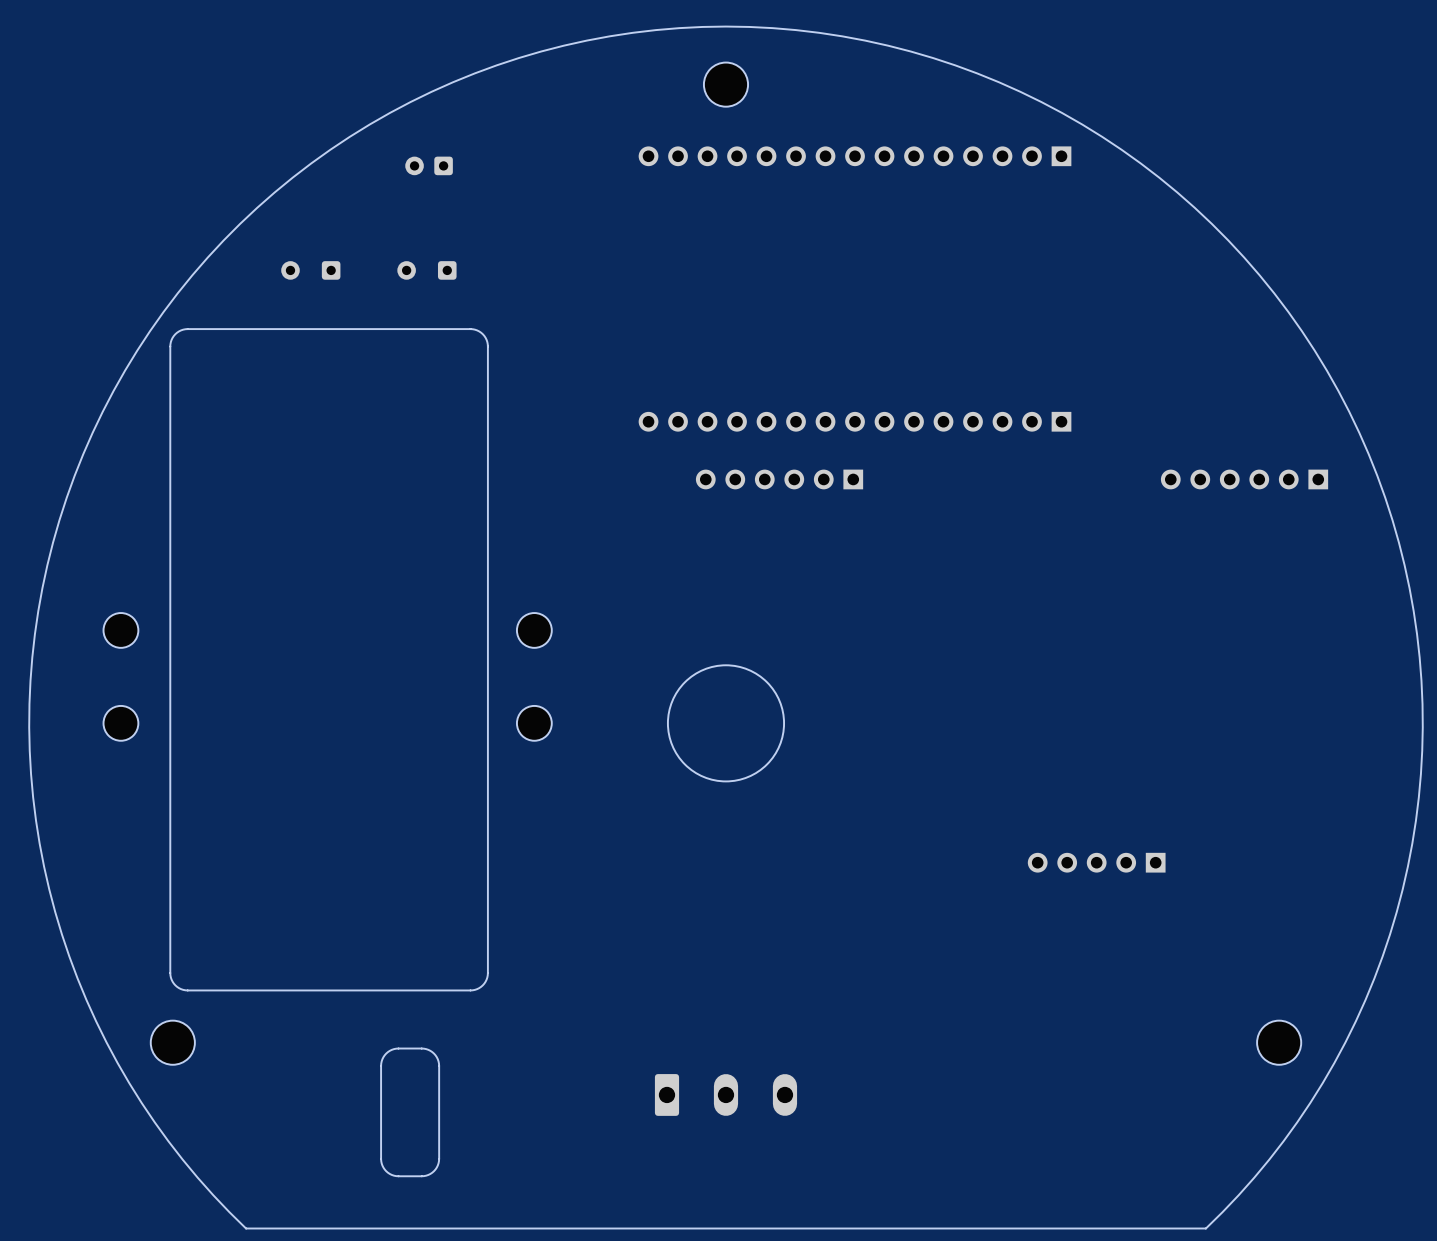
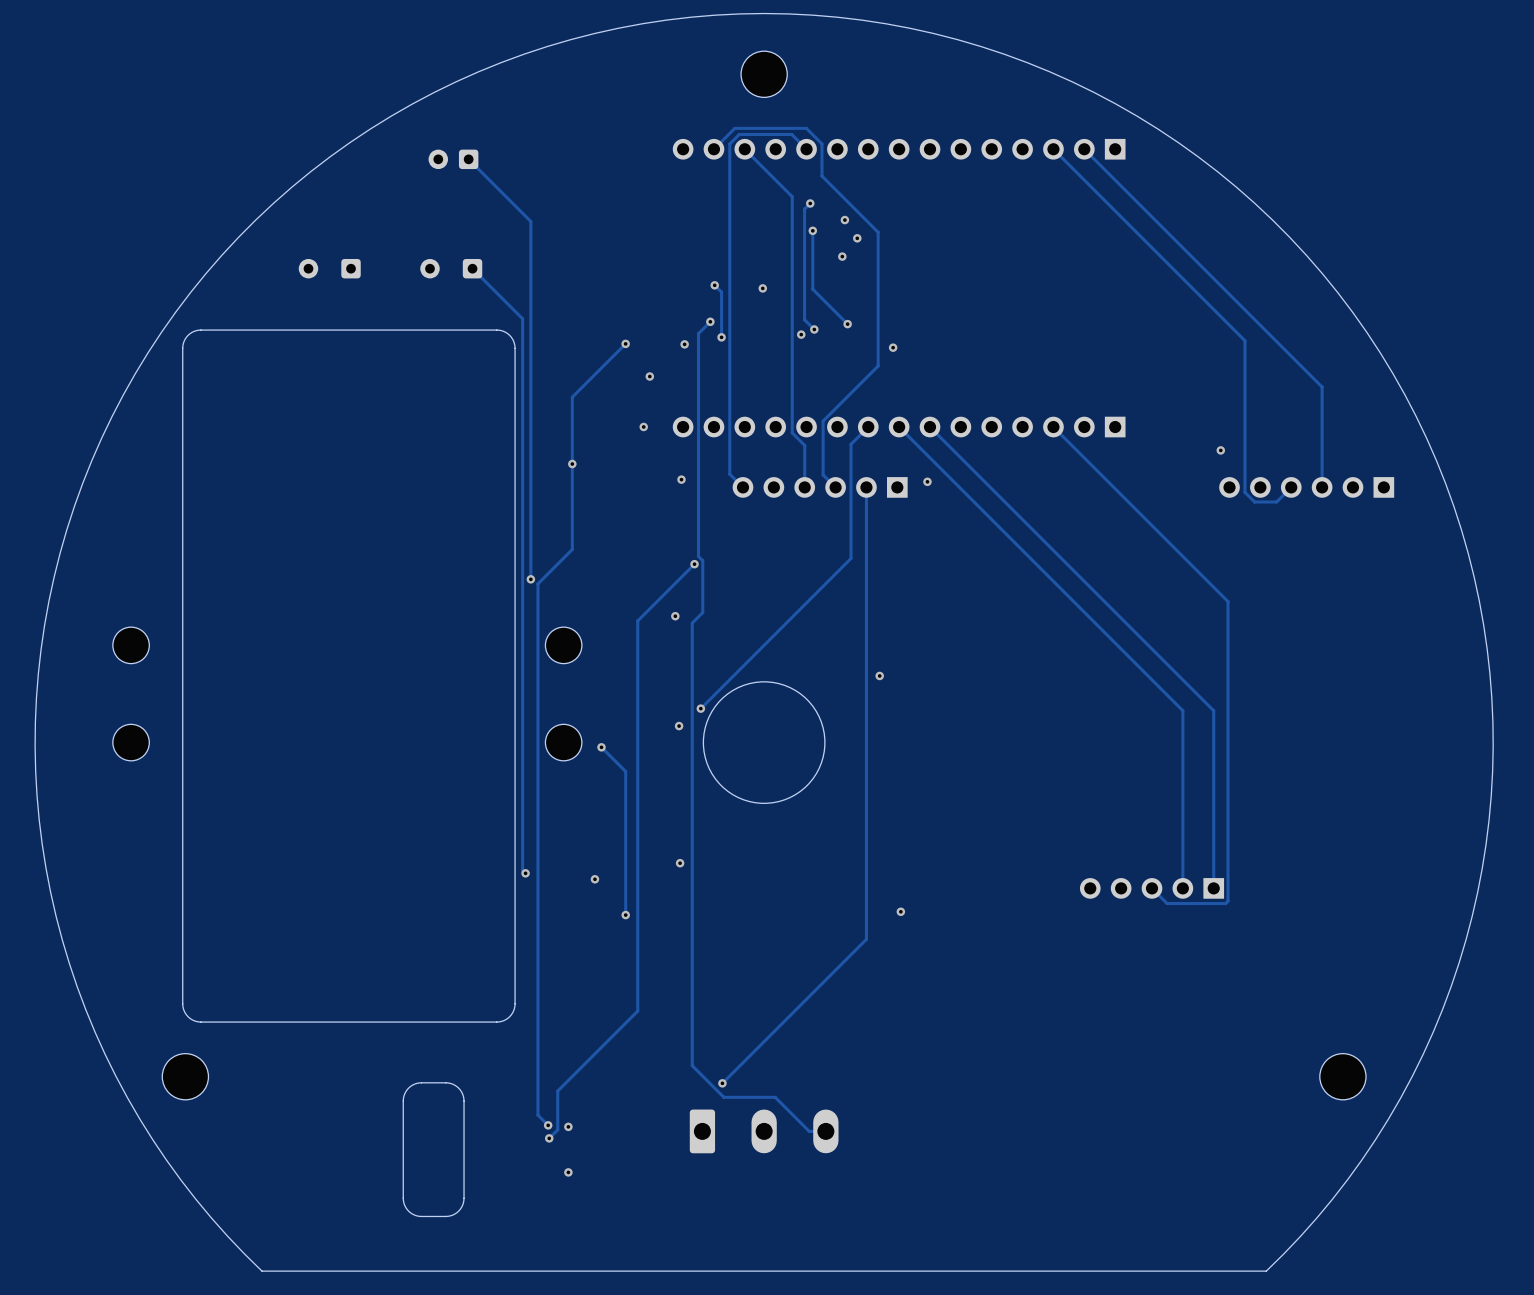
track: none -> (713, 149) (734, 128) (806, 128) (821, 143) (821, 176) (878, 232) (878, 366) (823, 421) (823, 474) (835, 487)
track: none -> (744, 149) (792, 196) (792, 432) (804, 445) (804, 487)
track: none -> (806, 149) (791, 134) (739, 134) (729, 143) (729, 474) (743, 487)
track: none -> (1053, 149) (1244, 340) (1244, 492) (1254, 502) (1276, 502) (1291, 487)
track: none -> (1084, 149) (1322, 387) (1322, 487)
track: none -> (468, 159) (530, 221) (530, 579)
track: none -> (810, 203) (804, 209) (804, 319) (814, 329)
via: none -> (810, 203)
via: none -> (844, 220)
track: none -> (812, 230) (812, 289) (847, 324)
via: none -> (812, 230)
via: none -> (857, 238)
via: none -> (842, 256)
track: none -> (472, 268) (522, 318) (522, 870) (525, 873)
track: none -> (714, 285) (721, 292) (721, 337)
via: none -> (714, 285)
via: none -> (762, 288)
track: none -> (710, 321) (698, 333) (698, 556) (702, 560) (702, 612) (692, 623) (692, 1065) (723, 1097) (775, 1097) (809, 1131) (825, 1131)
via: none -> (710, 321)
via: none -> (847, 324)
via: none -> (814, 329)
via: none -> (801, 334)
via: none -> (721, 337)
track: none -> (625, 343) (572, 397) (572, 549) (537, 583) (537, 1115) (548, 1125)
via: none -> (625, 343)
via: none -> (684, 344)
via: none -> (893, 347)
via: none -> (649, 376)
via: none -> (643, 426)
track: none -> (868, 427) (851, 444) (851, 558) (700, 708)
track: none -> (899, 427) (1182, 710) (1182, 888)
track: none -> (930, 427) (1213, 710) (1213, 888)
track: none -> (1053, 427) (1228, 601) (1228, 901) (1225, 903) (1167, 903) (1152, 888)
via: none -> (1220, 450)
via: none -> (572, 464)
via: none -> (681, 479)
via: none -> (927, 481)
track: none -> (866, 487) (866, 939) (722, 1083)
track: none -> (694, 564) (637, 620) (637, 1011) (557, 1091) (557, 1129) (549, 1138)
via: none -> (694, 564)
via: none -> (530, 579)
via: none -> (675, 616)
via: none -> (879, 675)
via: none -> (700, 708)
via: none -> (679, 726)
track: none -> (601, 747) (625, 771) (625, 915)
via: none -> (601, 747)
via: none -> (680, 863)
via: none -> (525, 873)
via: none -> (594, 879)
via: none -> (900, 911)
via: none -> (625, 915)
via: none -> (722, 1083)
via: none -> (548, 1125)
via: none -> (568, 1126)
via: none -> (549, 1138)
via: none -> (568, 1172)

